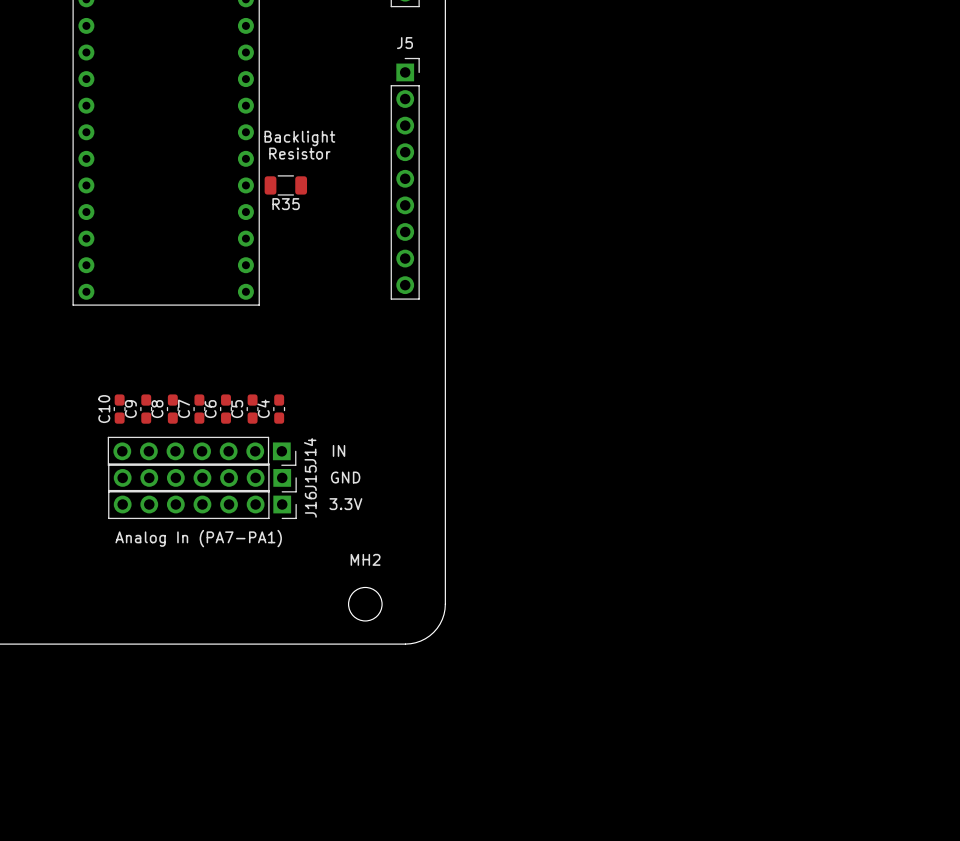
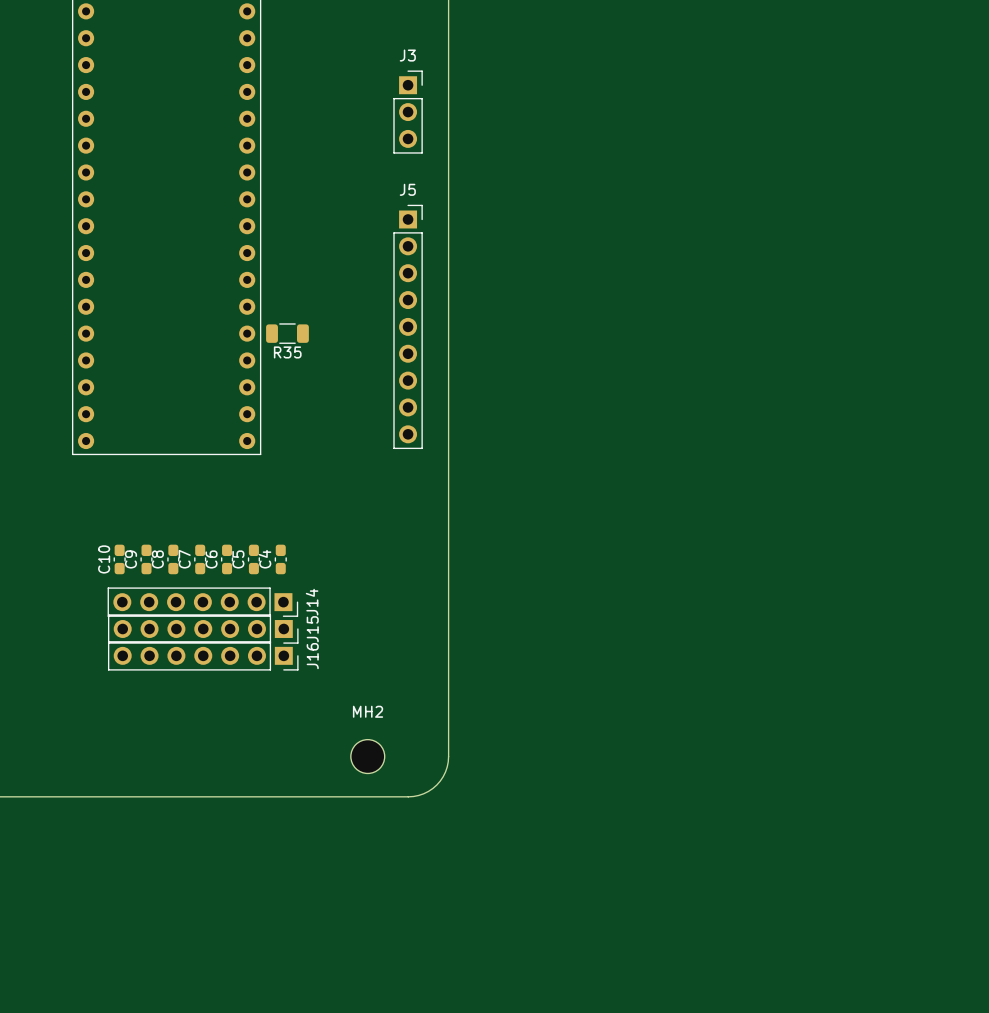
text: Backlight (299, 138) -> none
text: Resistor (299, 153) -> none
text: IN (339, 450) -> none
text: GND (345, 477) -> none
text: 3.3V (345, 504) -> none
text: Analog In (PA7-PA1) (198, 538) -> none

